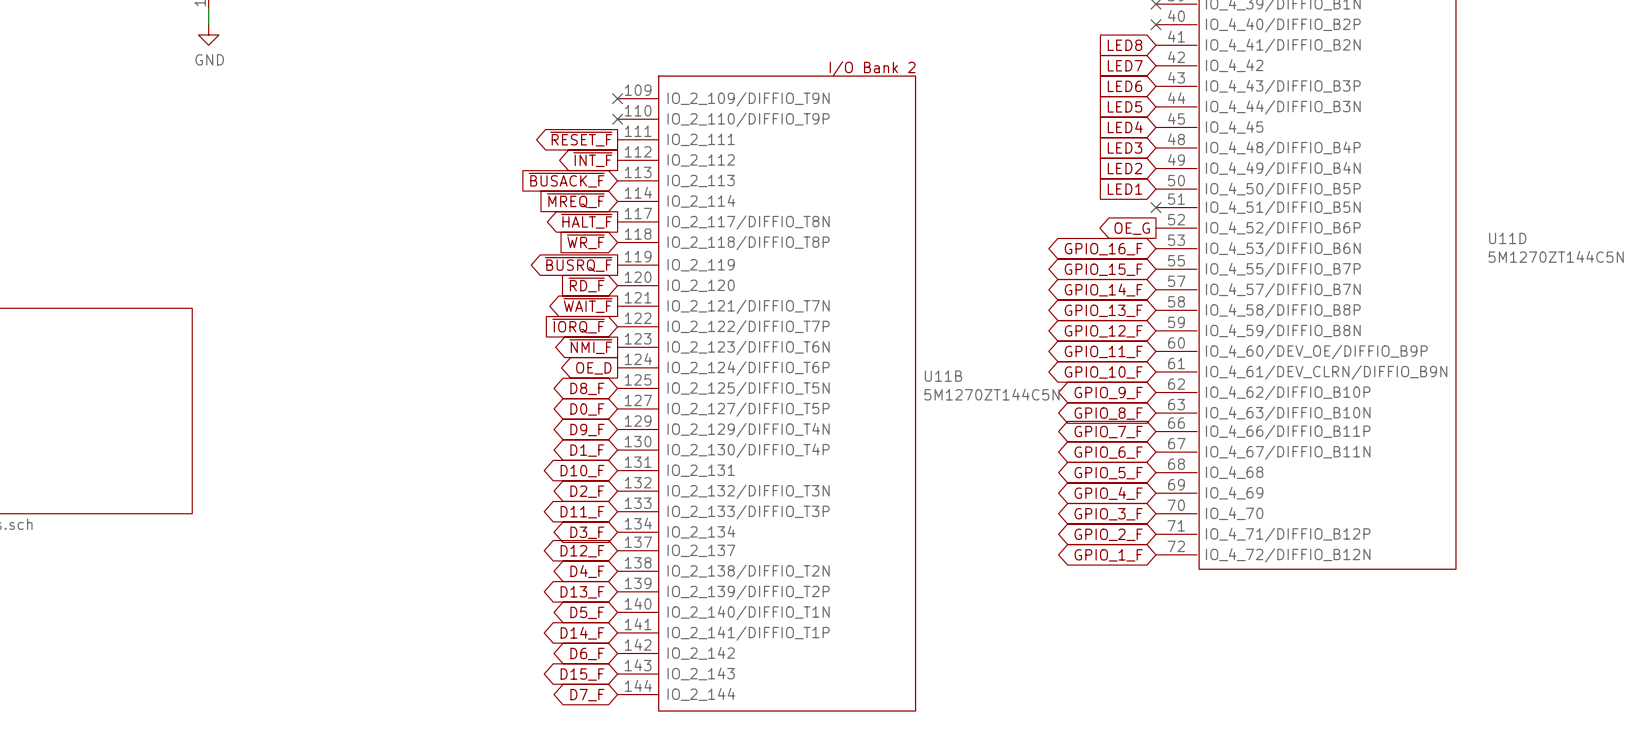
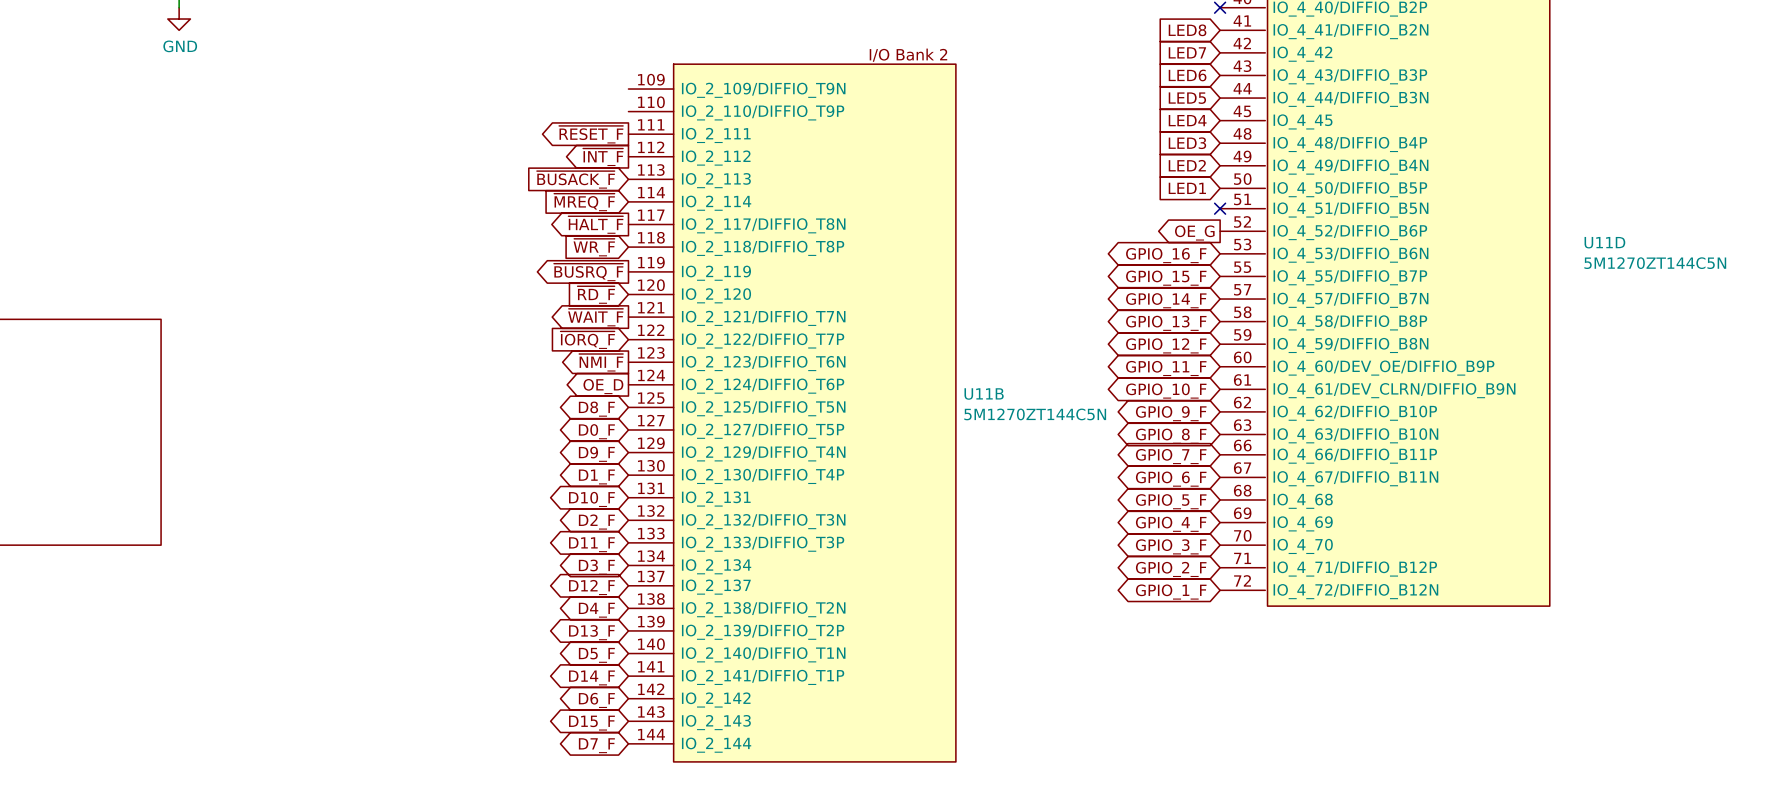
no-connect mark: (617, 98) -> none
no-connect mark: (617, 119) -> none

